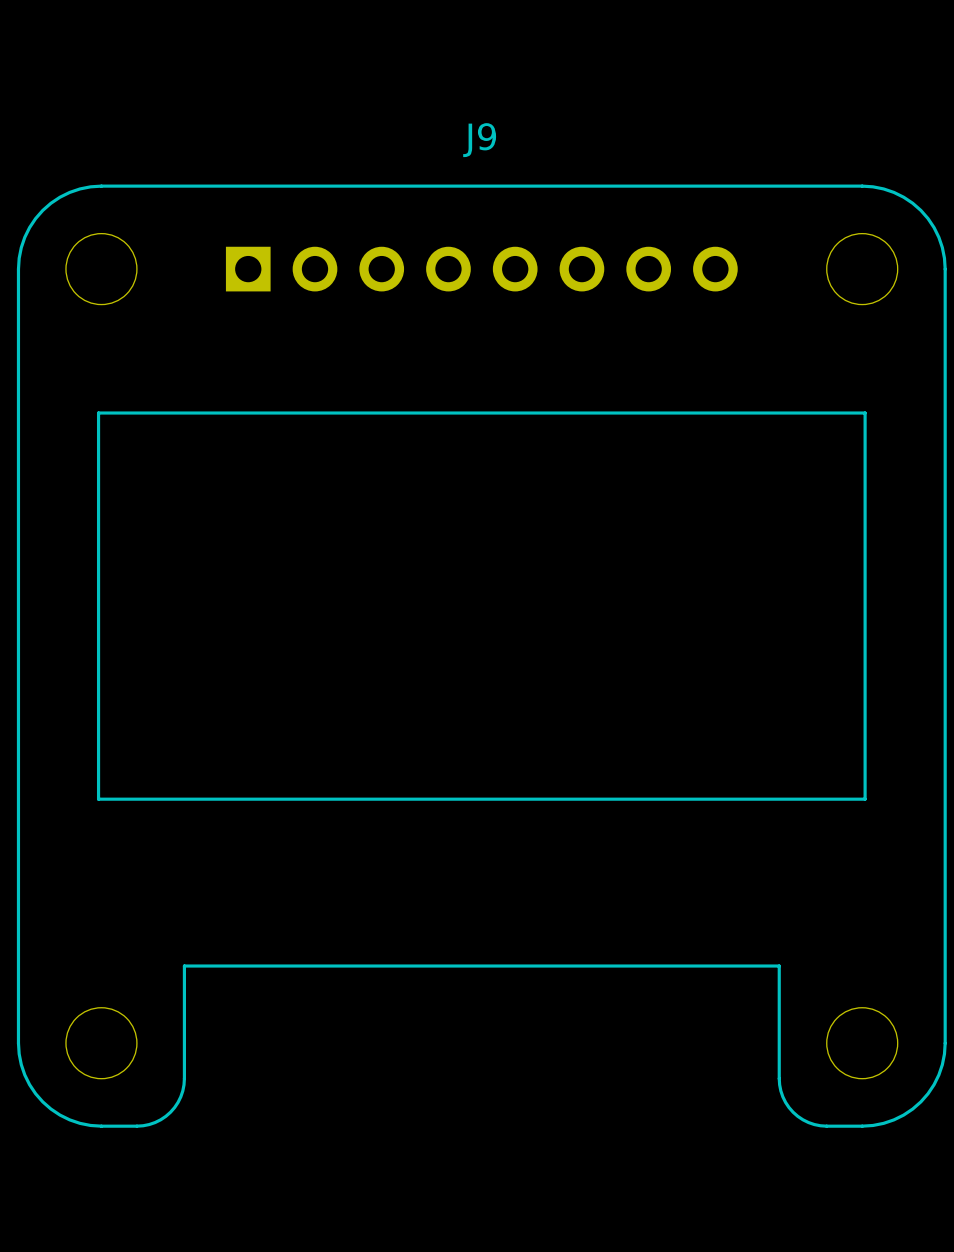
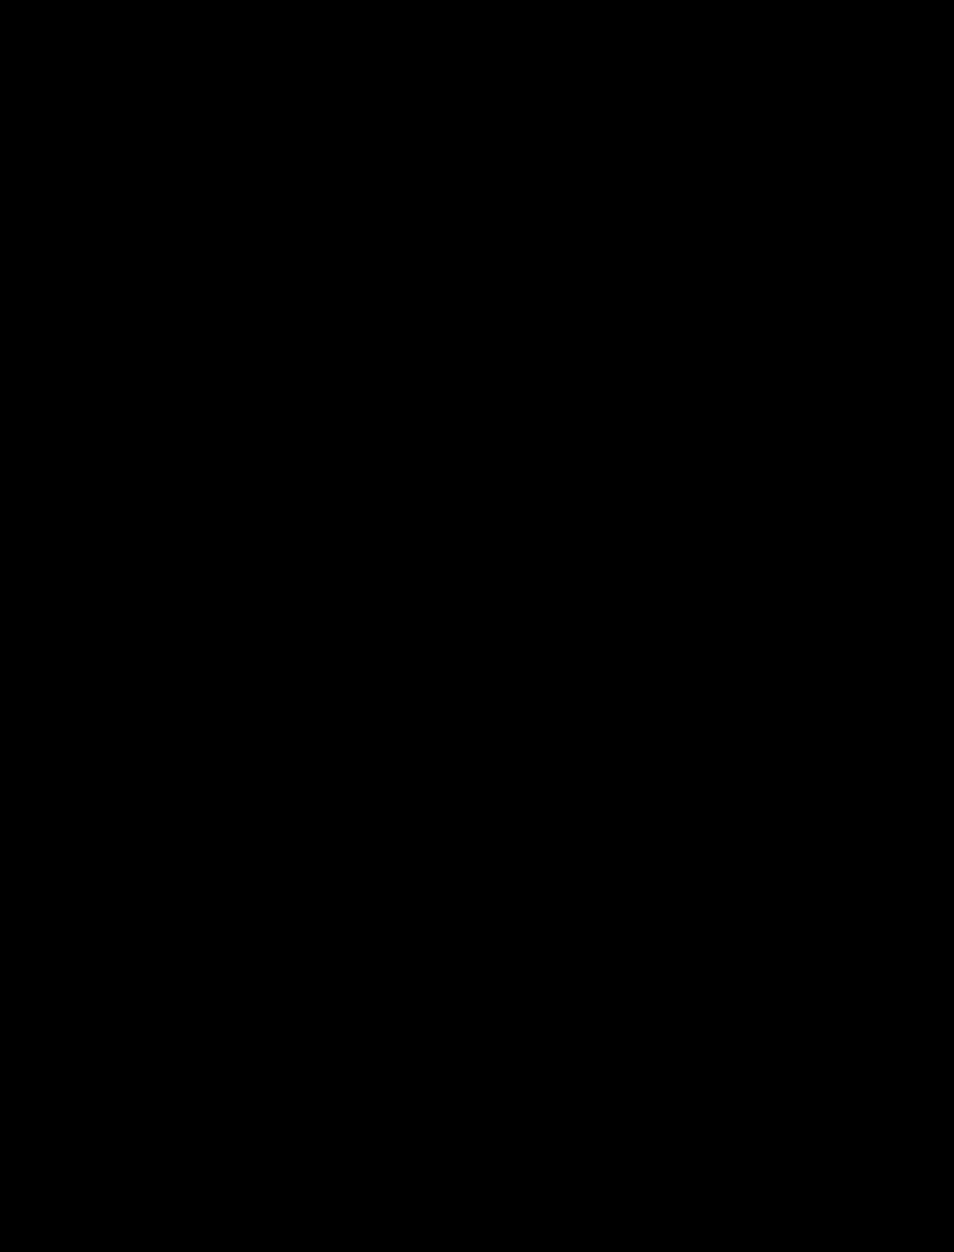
J9: (481, 656) -> none

